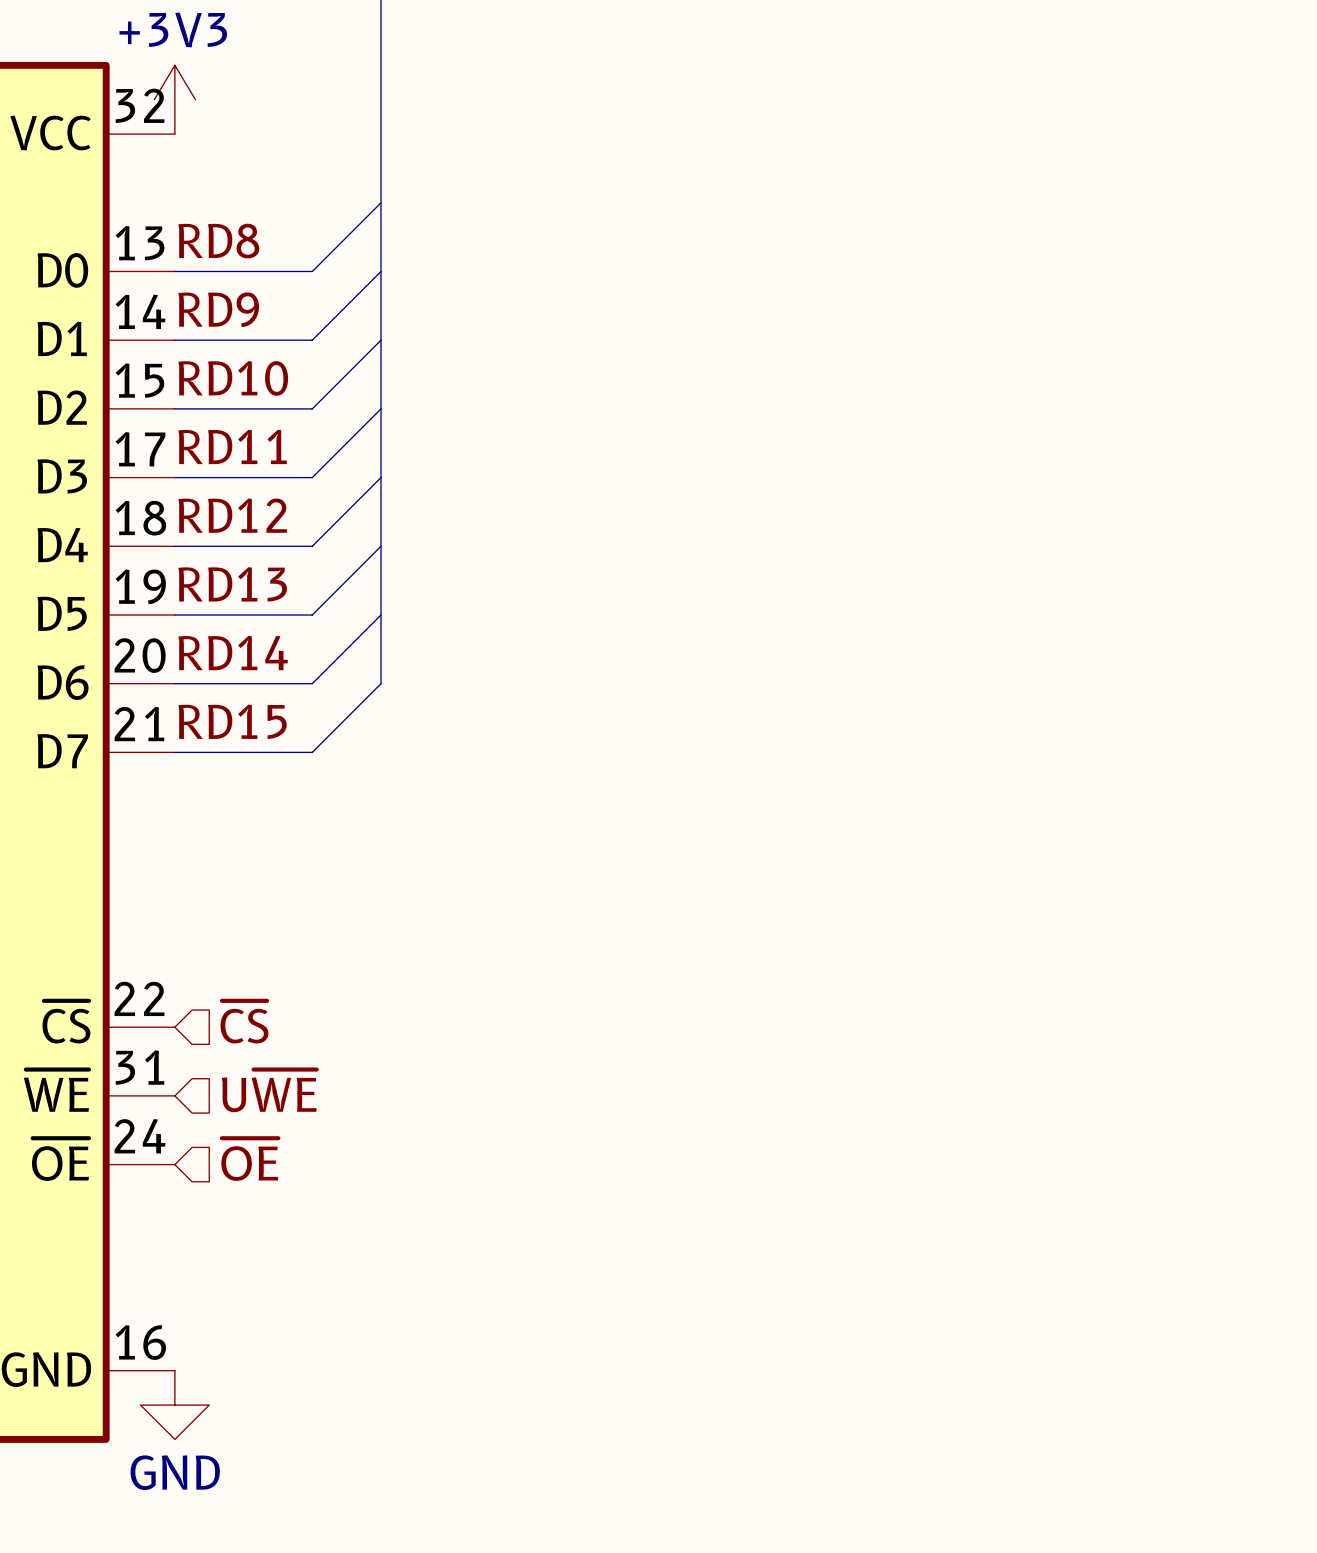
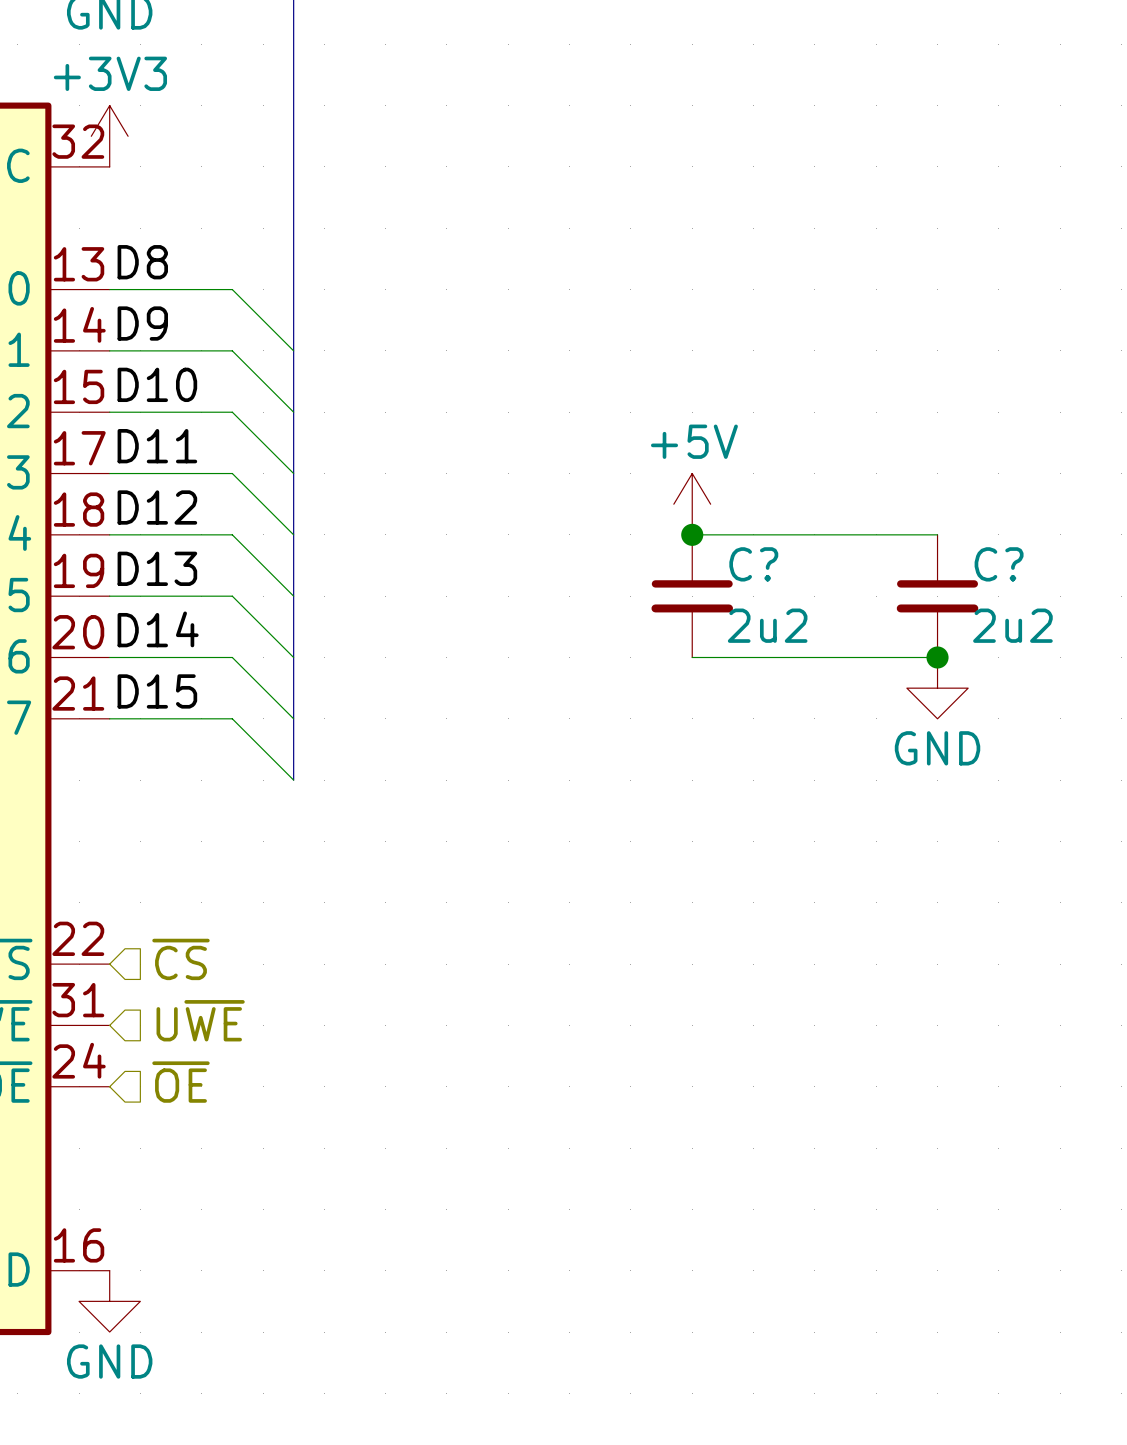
wire: (381, 202) (312, 271) -> (293, 350) (232, 289)
label: RD8 (218, 241) -> D8 (142, 262)
wire: (381, 271) (312, 340) -> (293, 412) (232, 350)
label: RD9 (218, 309) -> D9 (142, 323)
wire: (381, 340) (312, 408) -> (293, 473) (232, 412)
label: RD10 (233, 378) -> D10 (157, 384)
wire: (381, 408) (312, 477) -> (293, 534) (232, 473)
label: RD11 (232, 446) -> D11 (157, 446)
wire: (381, 477) (312, 546) -> (293, 596) (232, 534)
power symbol: none -> +5V (692, 504)
label: RD12 (232, 515) -> D12 (157, 507)
wire: (381, 546) (312, 614) -> (293, 657) (232, 596)
wire: none -> (692, 534) (937, 534)
junction: none -> (692, 534)
label: RD13 (232, 584) -> D13 (157, 568)
wire: (381, 614) (312, 683) -> (293, 718) (232, 657)
C?: none -> 2u2 (692, 596)
C?: none -> 2u2 (937, 596)
label: RD14 (233, 653) -> D14 (158, 629)
wire: (381, 683) (312, 752) -> (293, 780) (232, 718)
bus: none -> (293, 657) (293, 780)
wire: none -> (692, 657) (937, 657)
junction: none -> (937, 657)
power symbol: none -> GND (937, 688)
label: RD15 (232, 721) -> D15 (157, 691)

